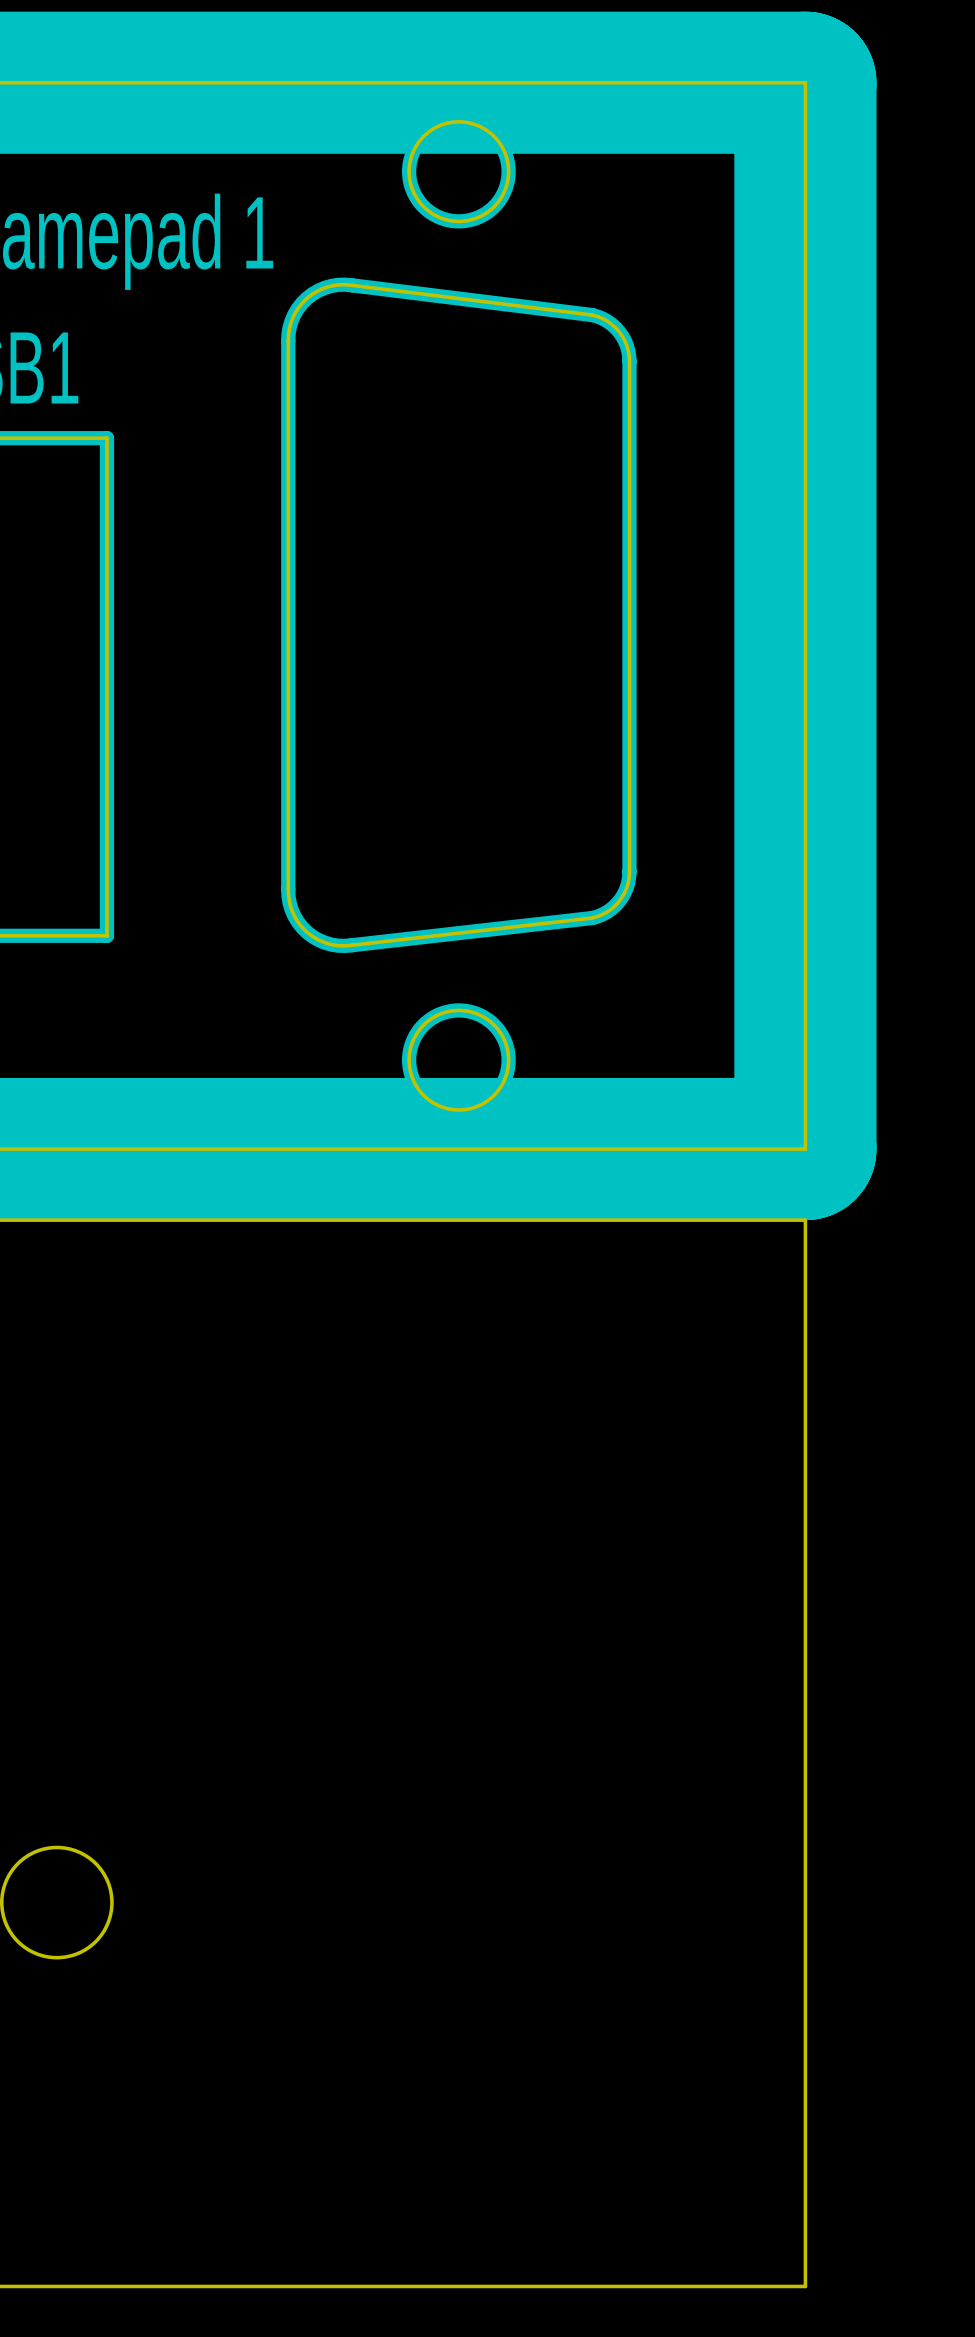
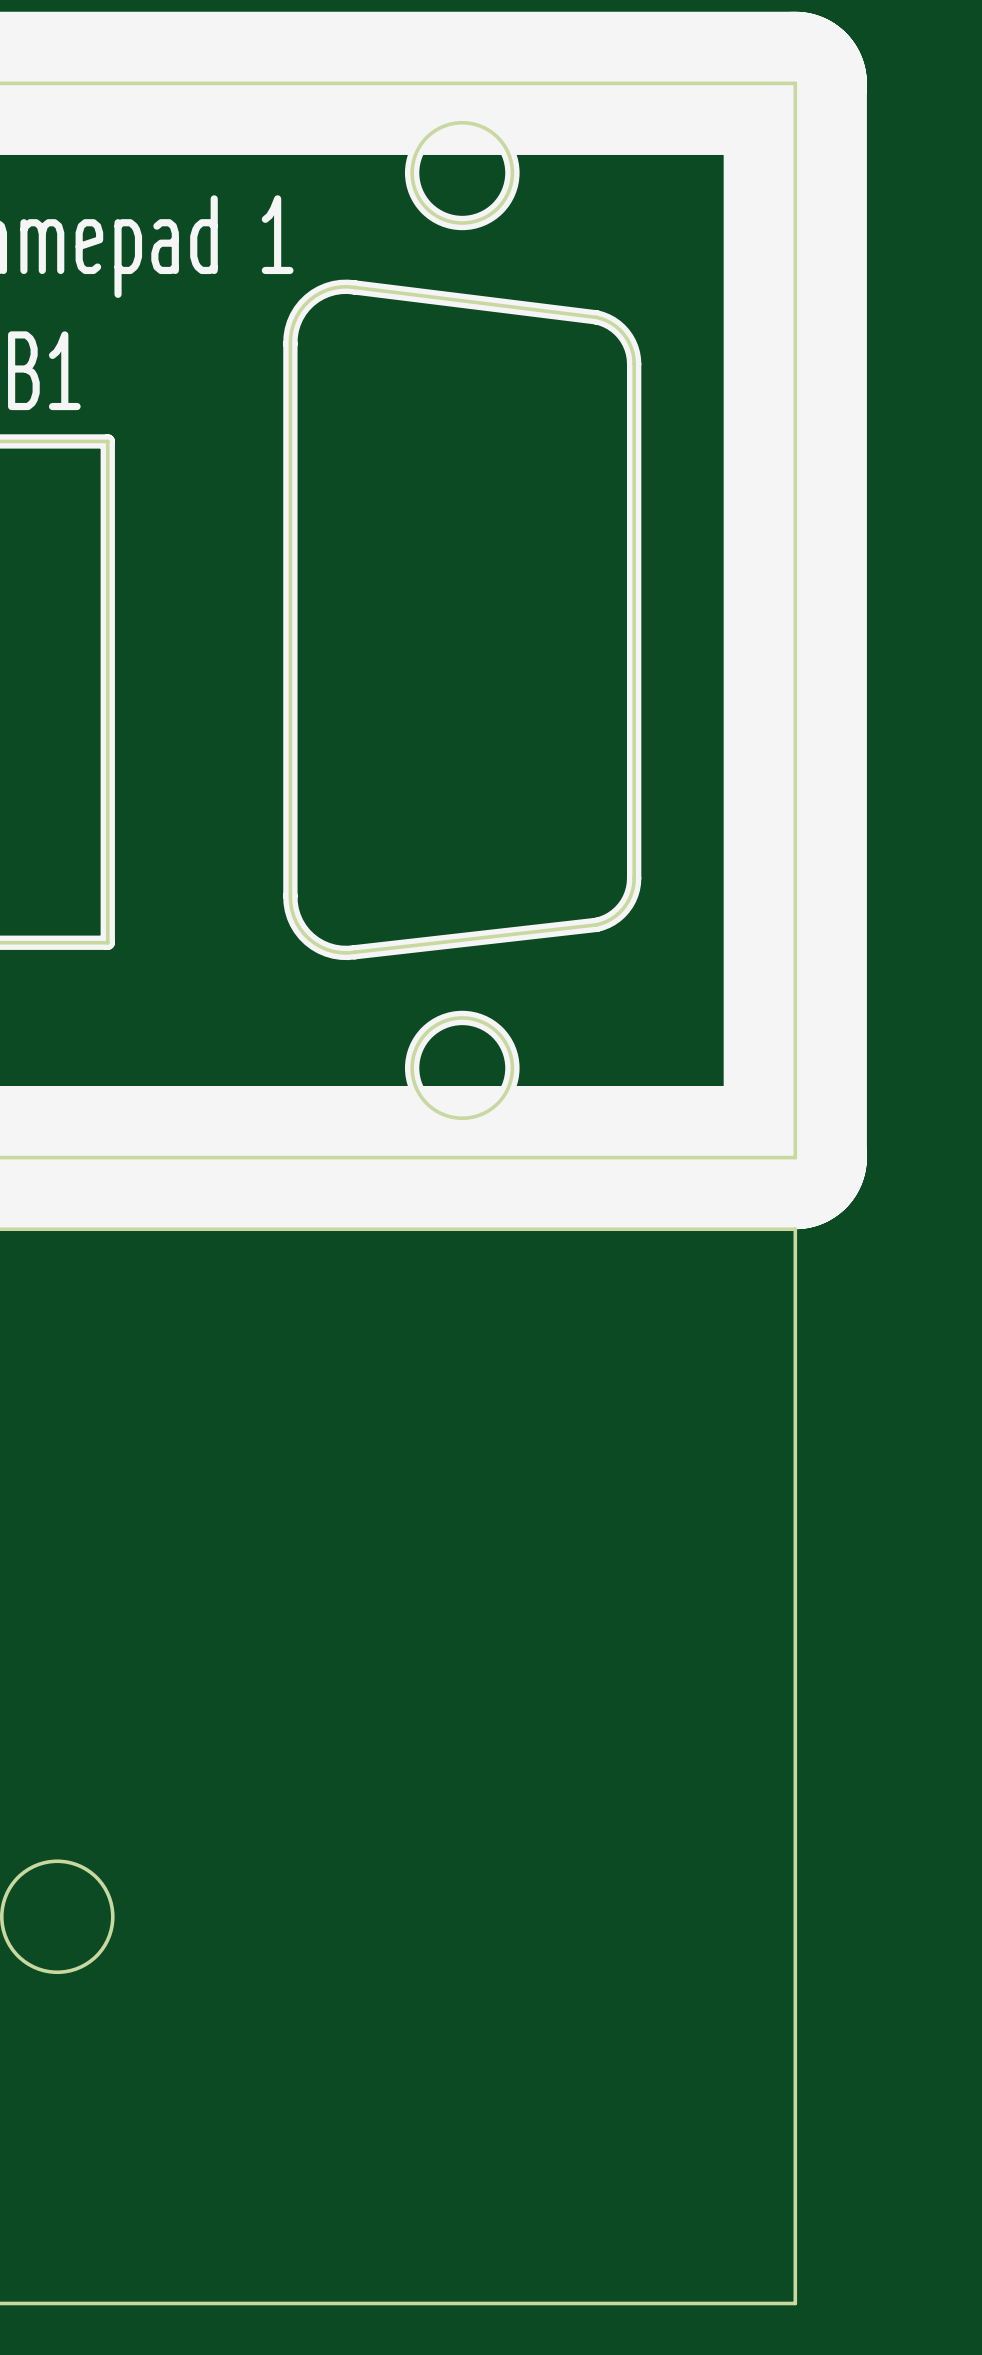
line: (789, 82) (805, 82) (805, 1149) (789, 1149) -> (795, 83) (795, 1157)
board edge: (789, 82) (805, 82) (805, 1149) (789, 1149) -> (795, 83) (795, 1157)
board edge: (789, 1220) (805, 1220) (805, 2286) (789, 2286) -> (795, 1229) (795, 2303)

